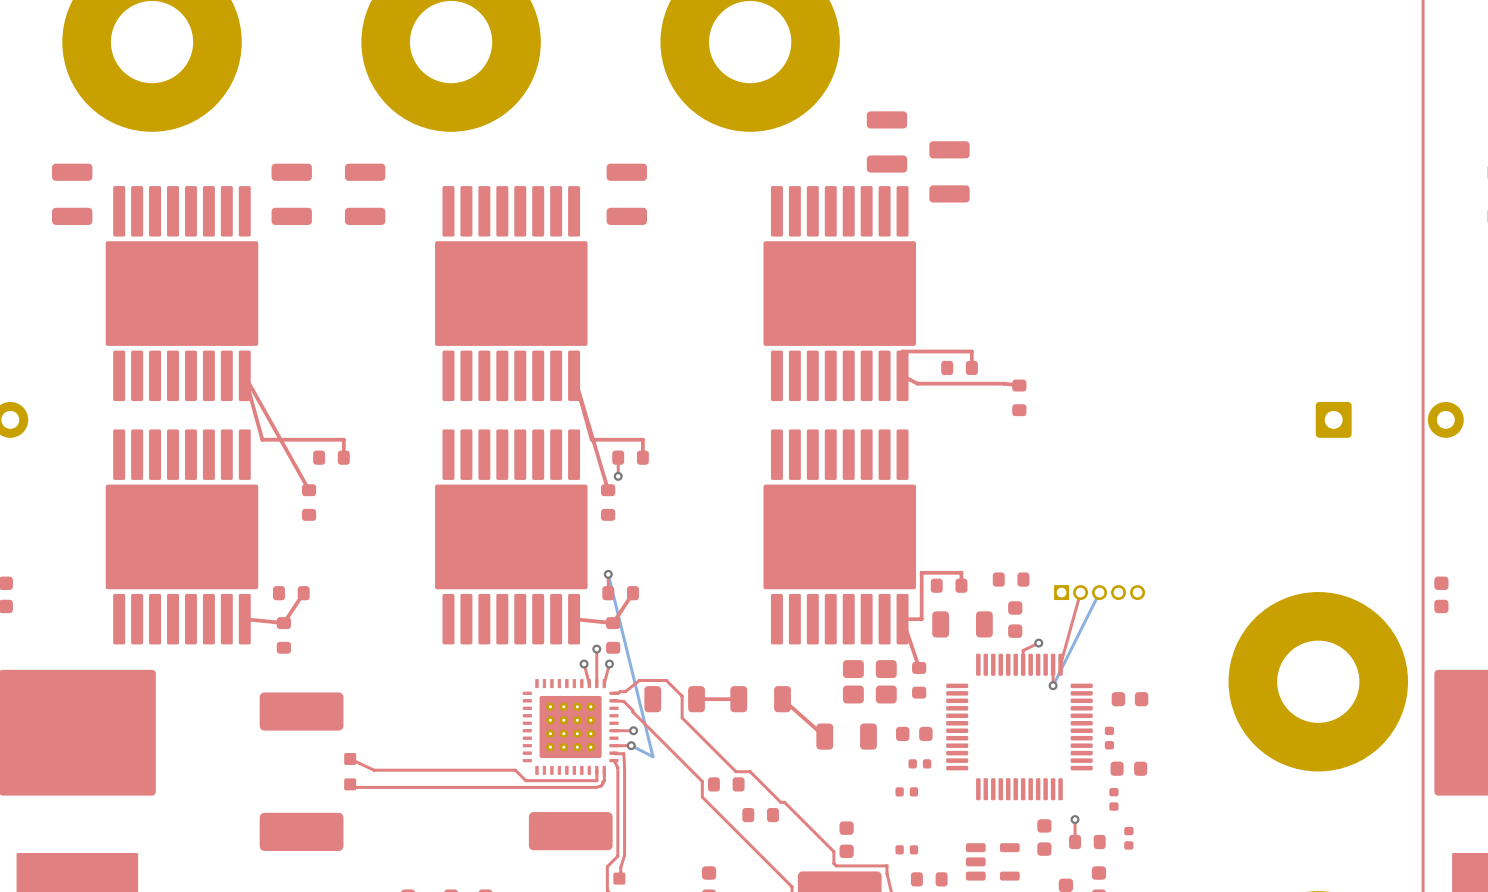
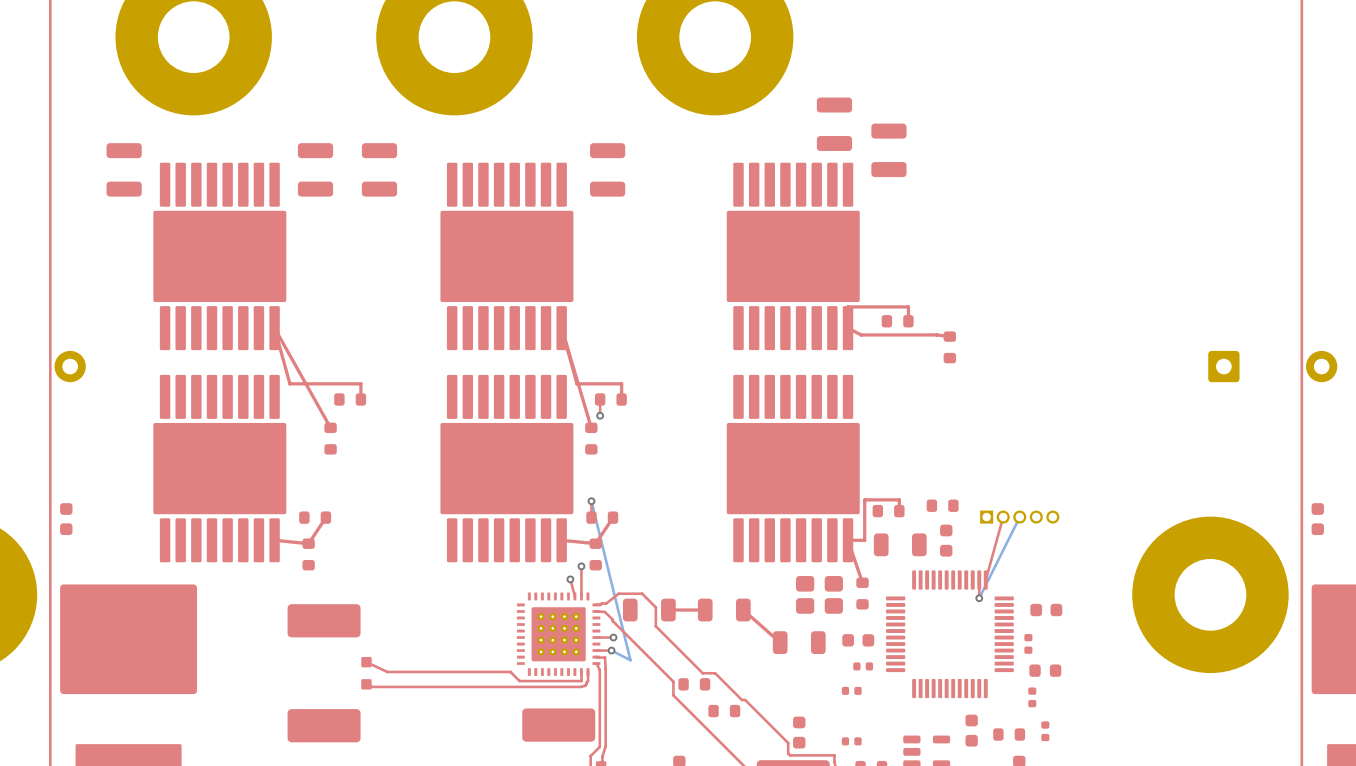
top track: (1038, 643) (1023, 650) (1023, 664) -> none
via: (1038, 643) -> none
top track: (609, 664) (604, 683) -> none
via: (609, 664) -> none
top track: (1075, 819) (1075, 841) -> none
via: (1075, 819) -> none

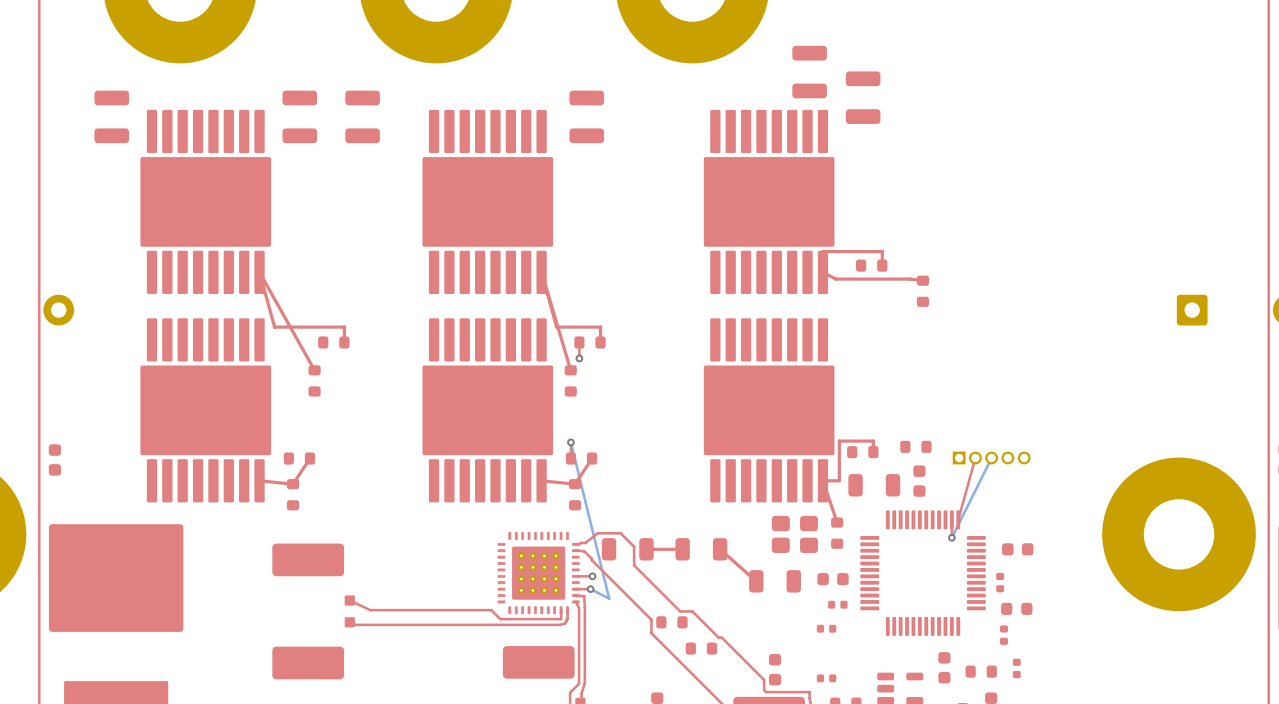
top track: (581, 566) (581, 596) -> none
via: (581, 566) -> none
top track: (570, 579) (574, 596) -> none
via: (570, 579) -> none

